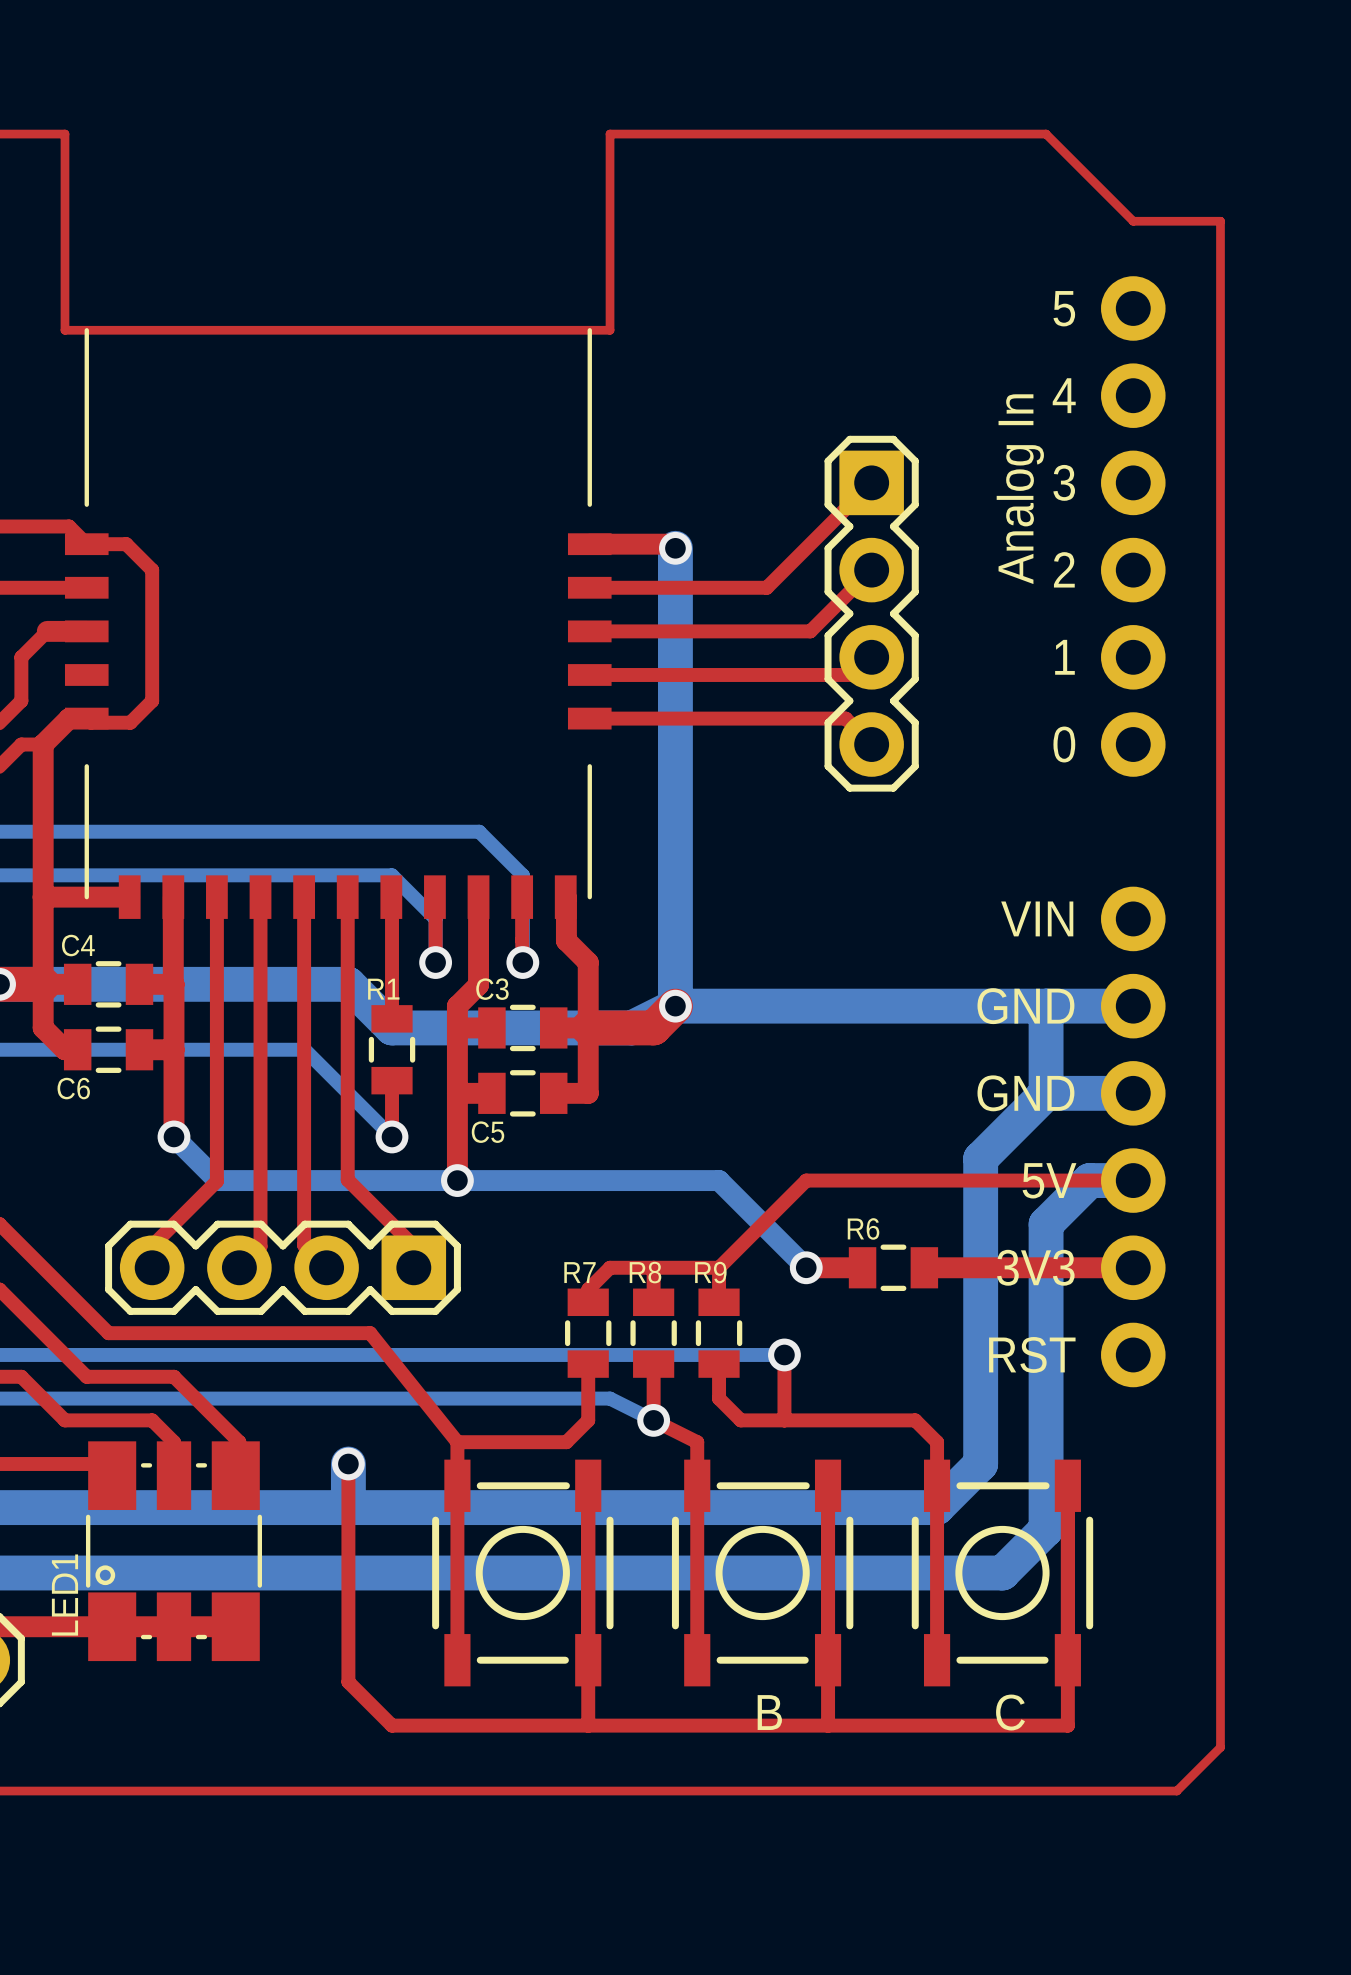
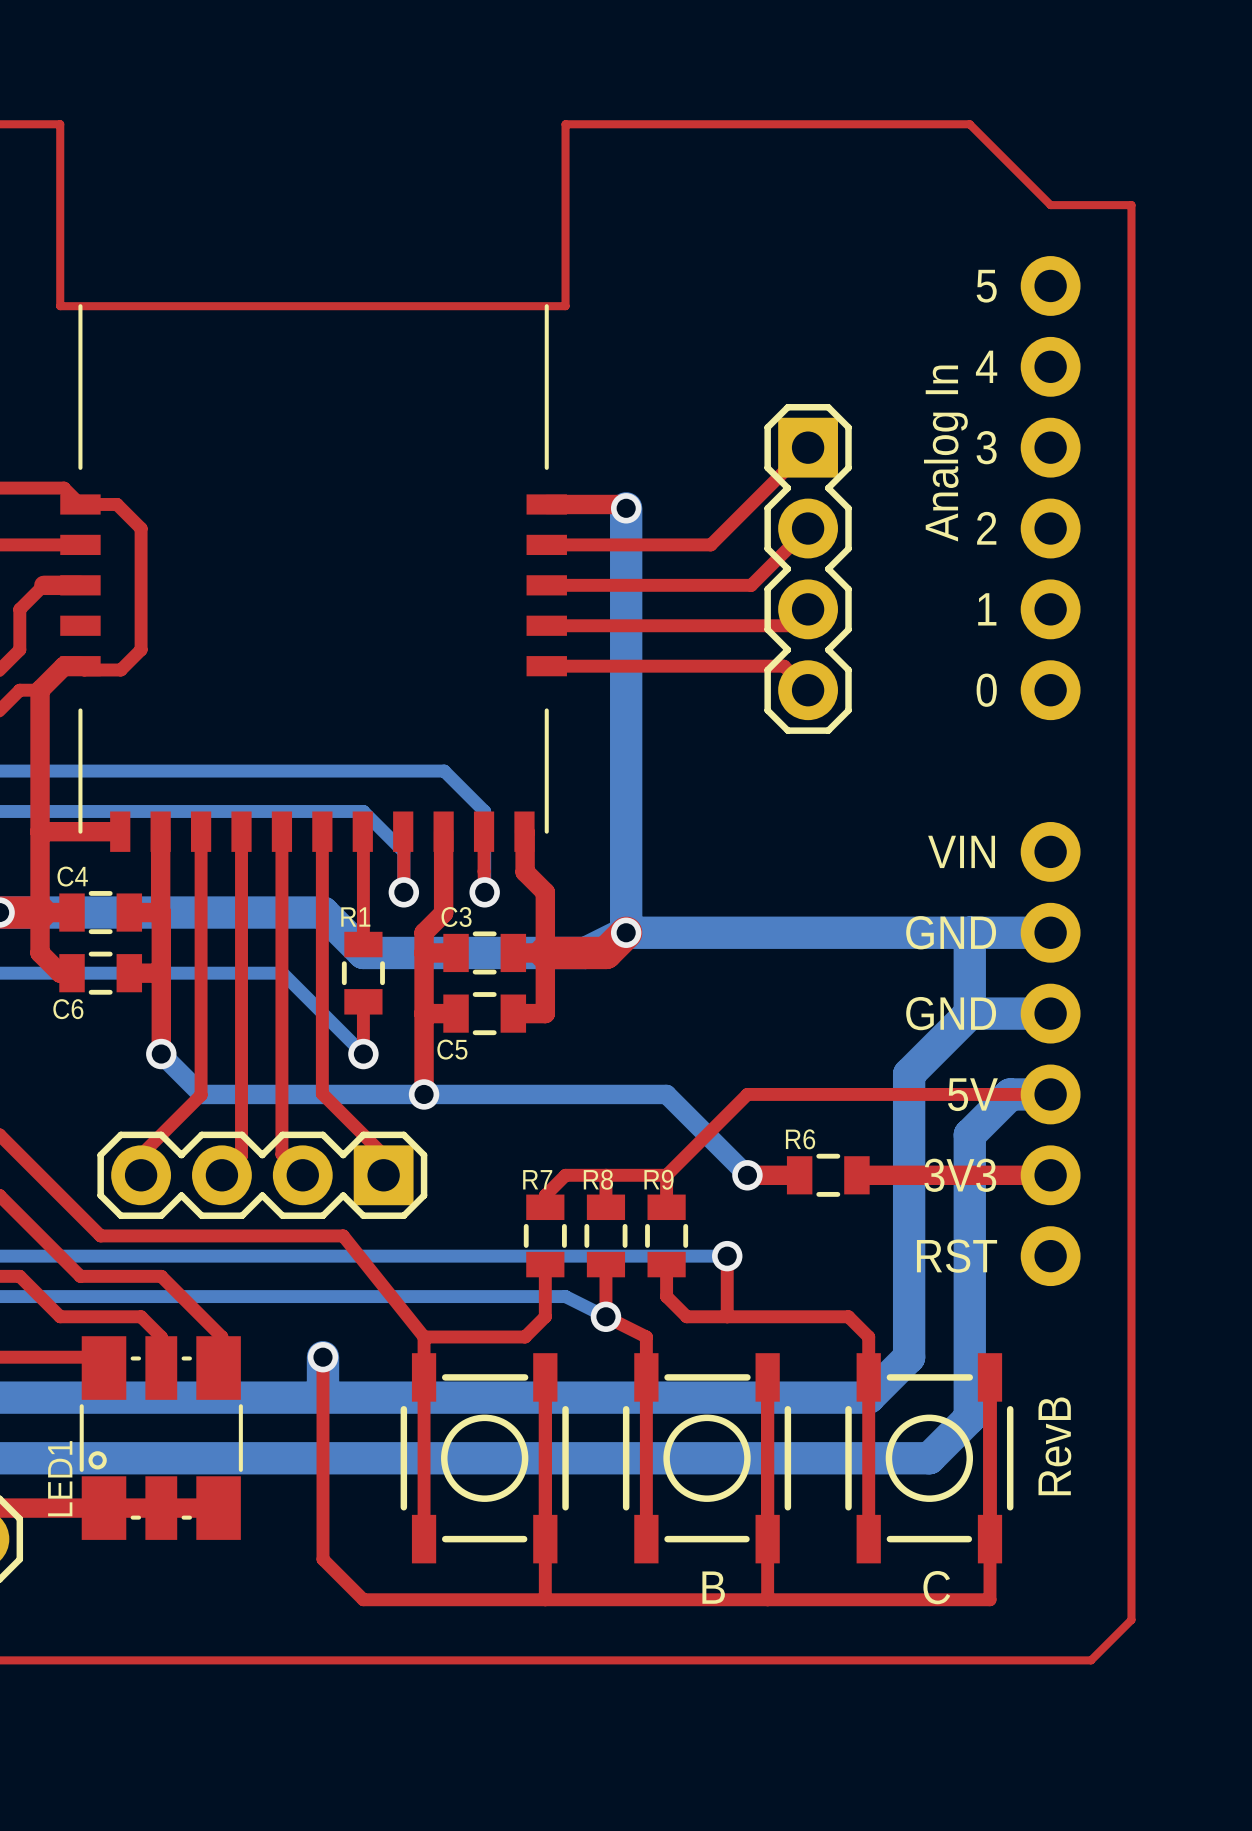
text: none -> RevB (1054, 1446)

